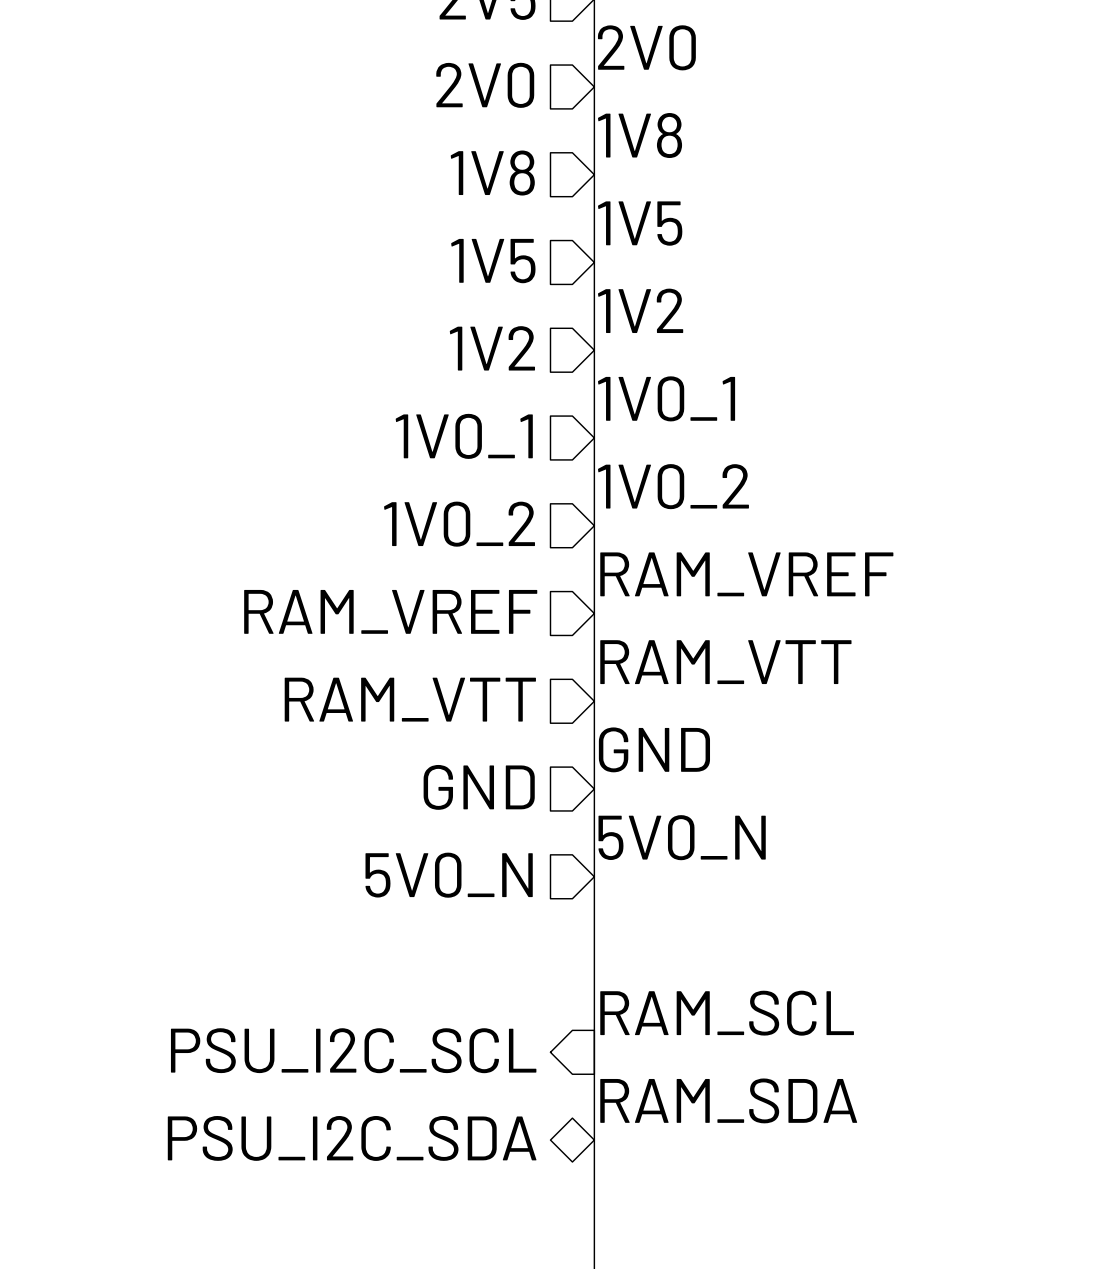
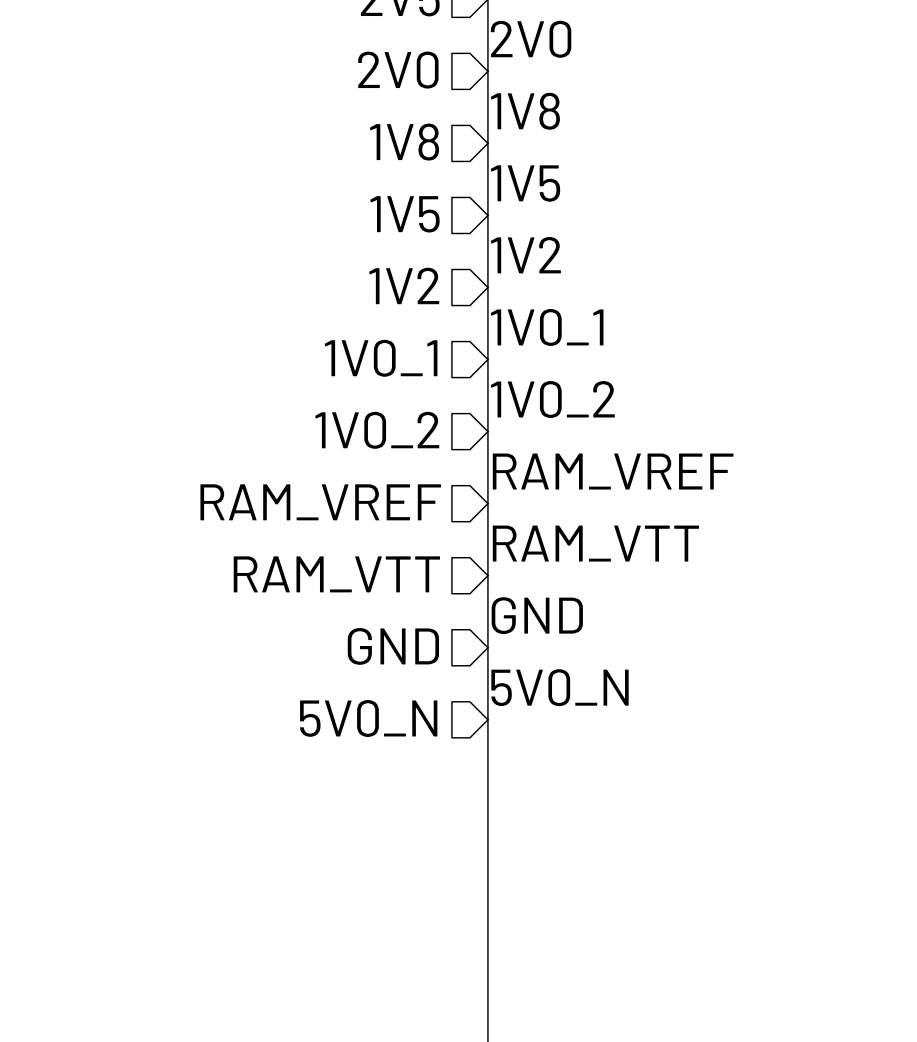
label: RAM_SCL (727, 1013) -> none
sheet pin: PSU_I2C_SCL (353, 1050) -> none
label: RAM_SDA (728, 1100) -> none
sheet pin: PSU_I2C_SDA (352, 1138) -> none

